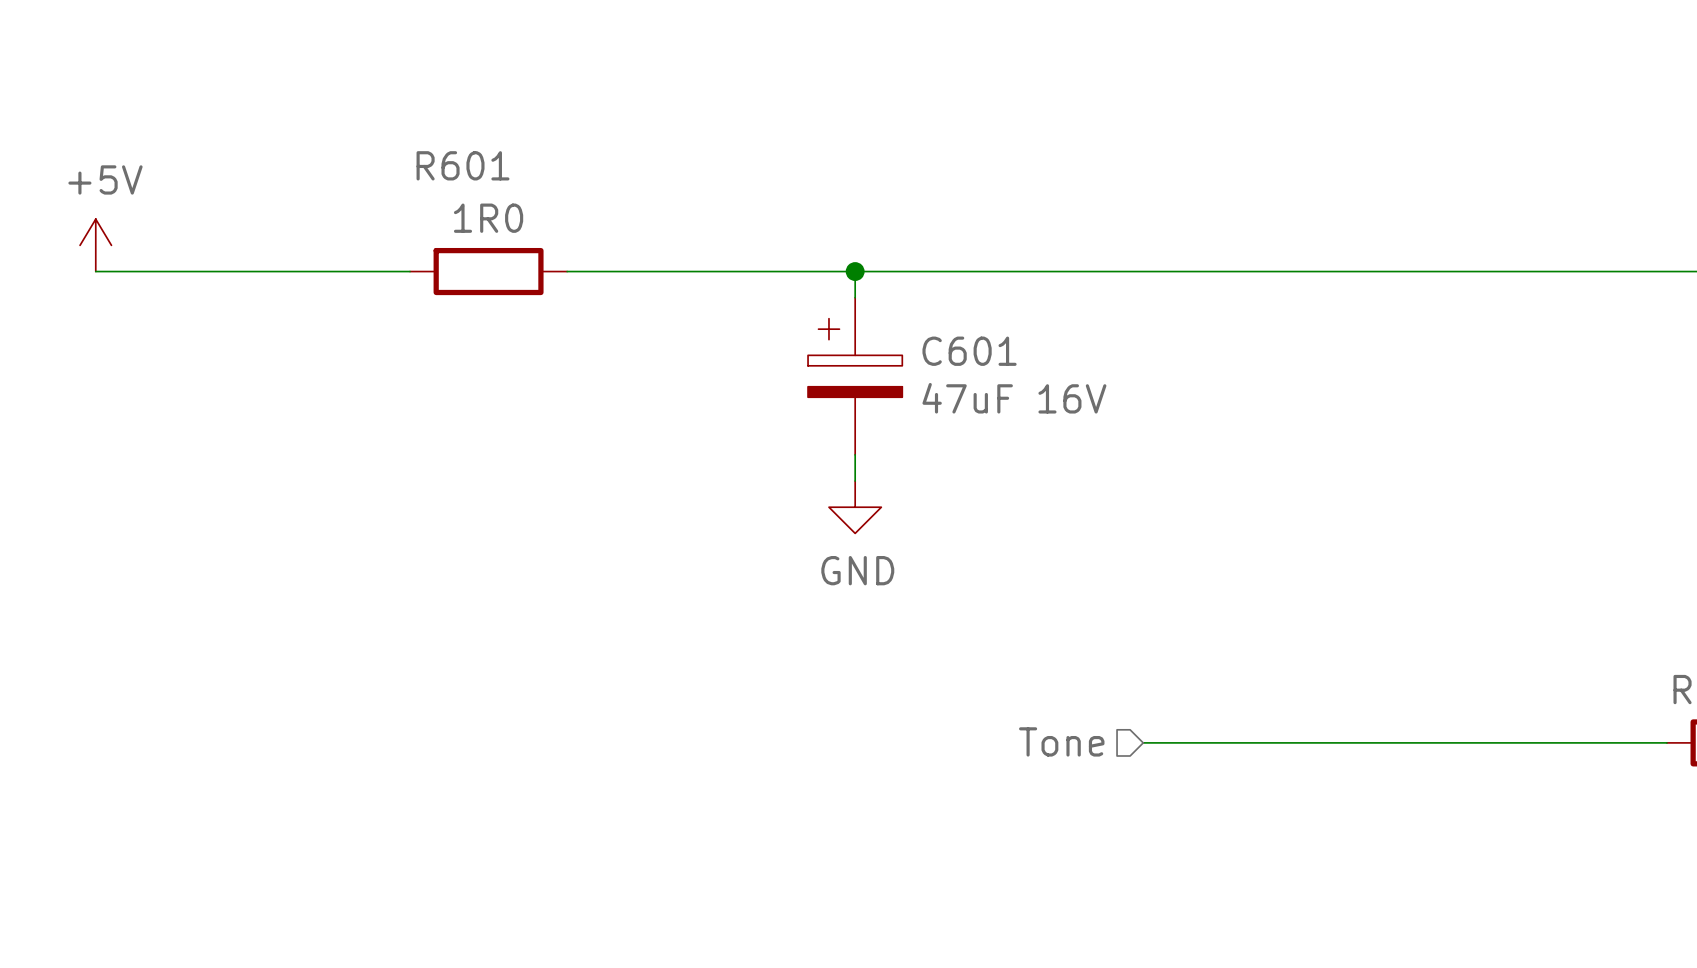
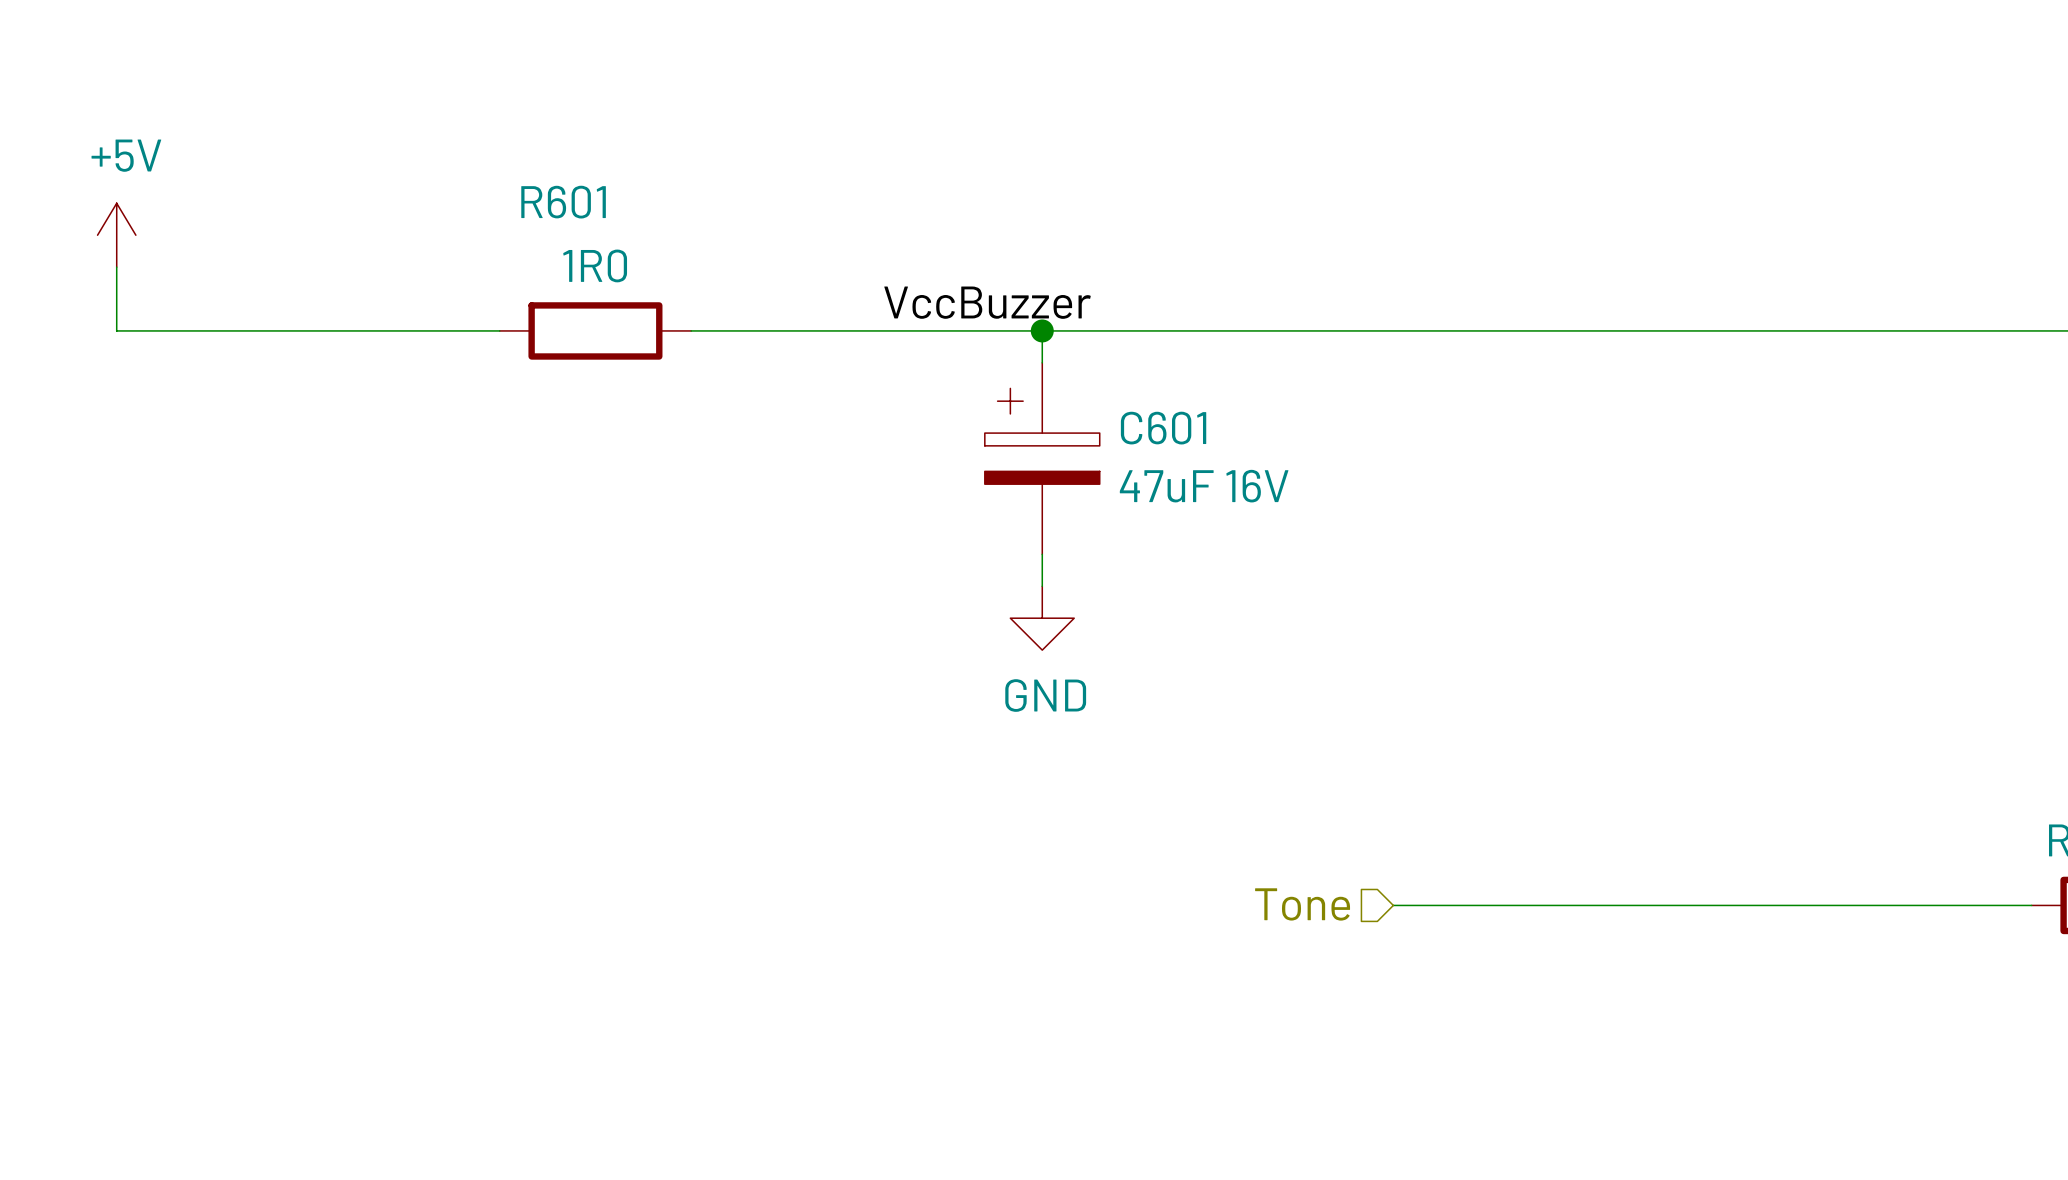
power symbol position: +5V (95, 245) -> +5V (116, 235)
label: none -> VccBuzzer (987, 302)

